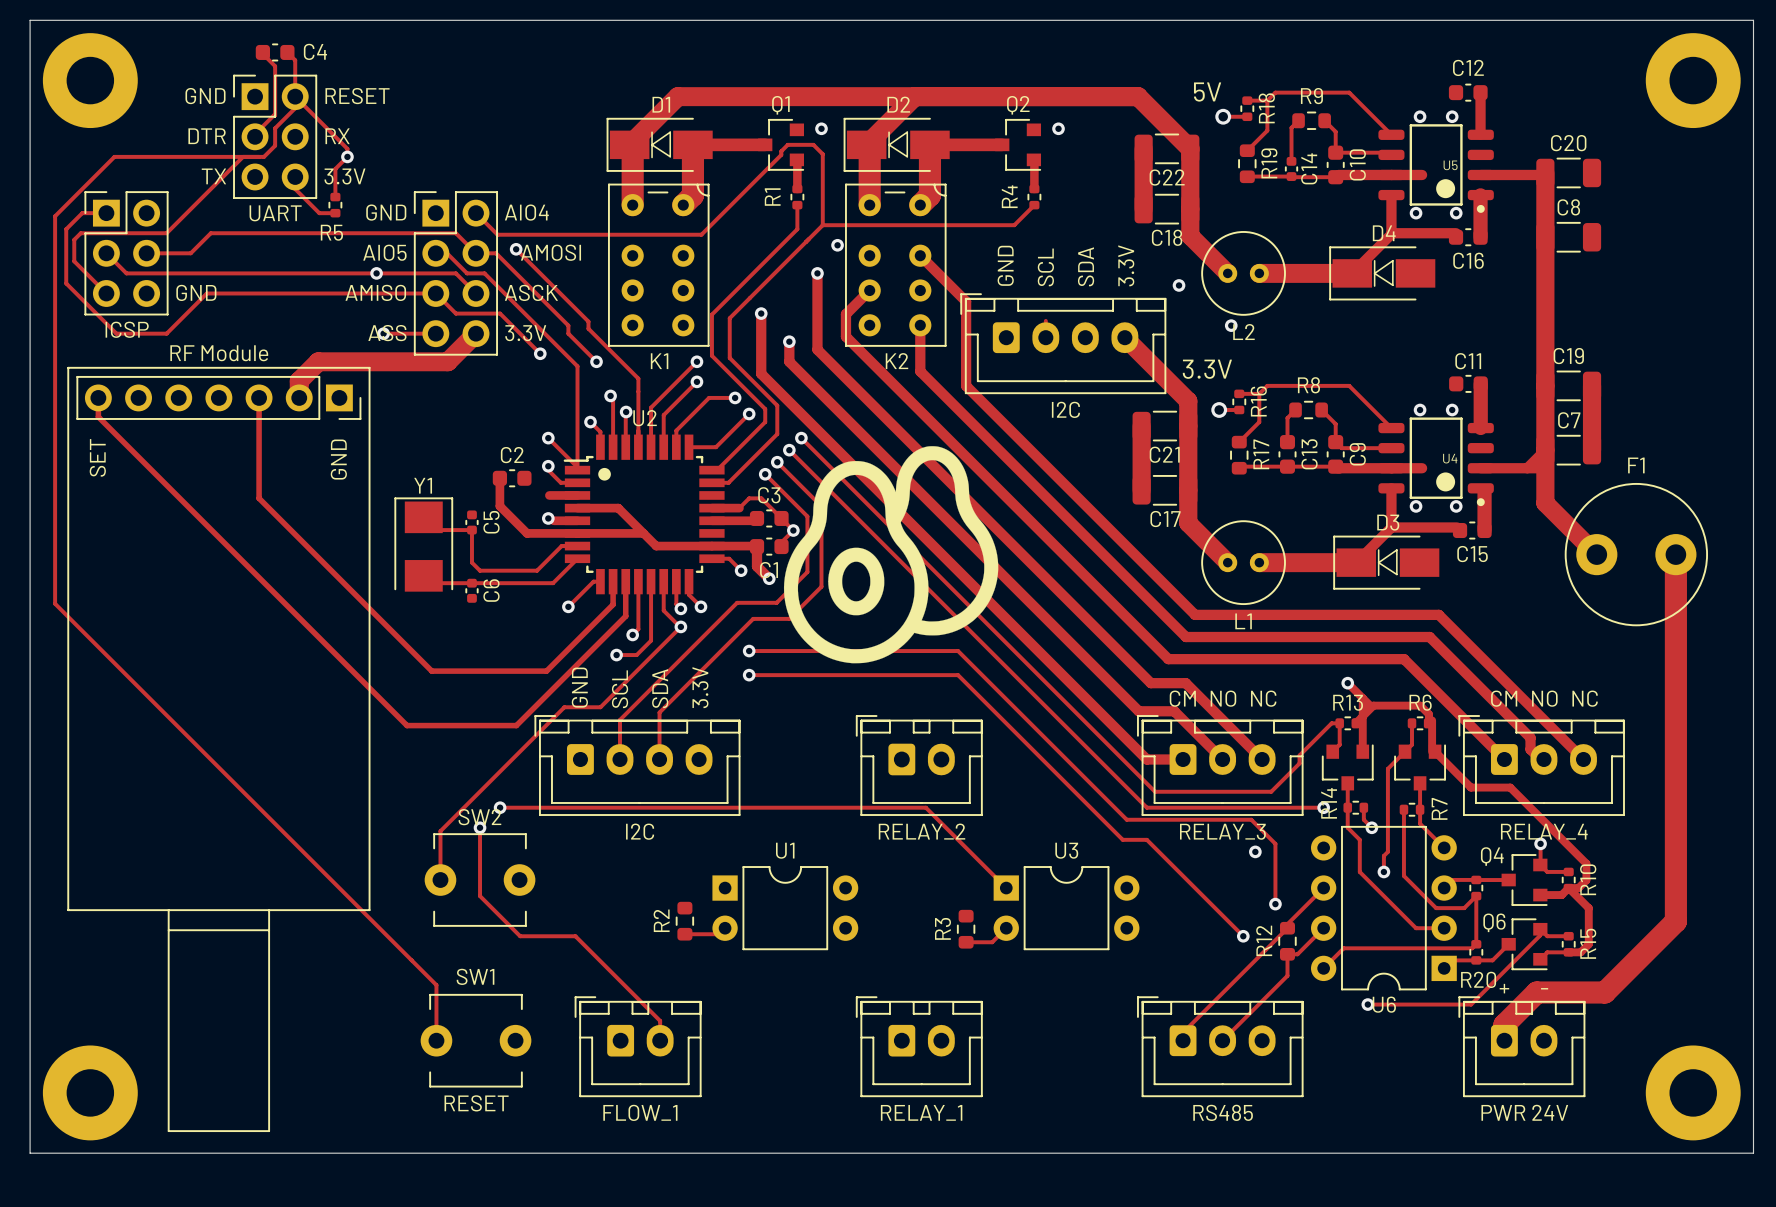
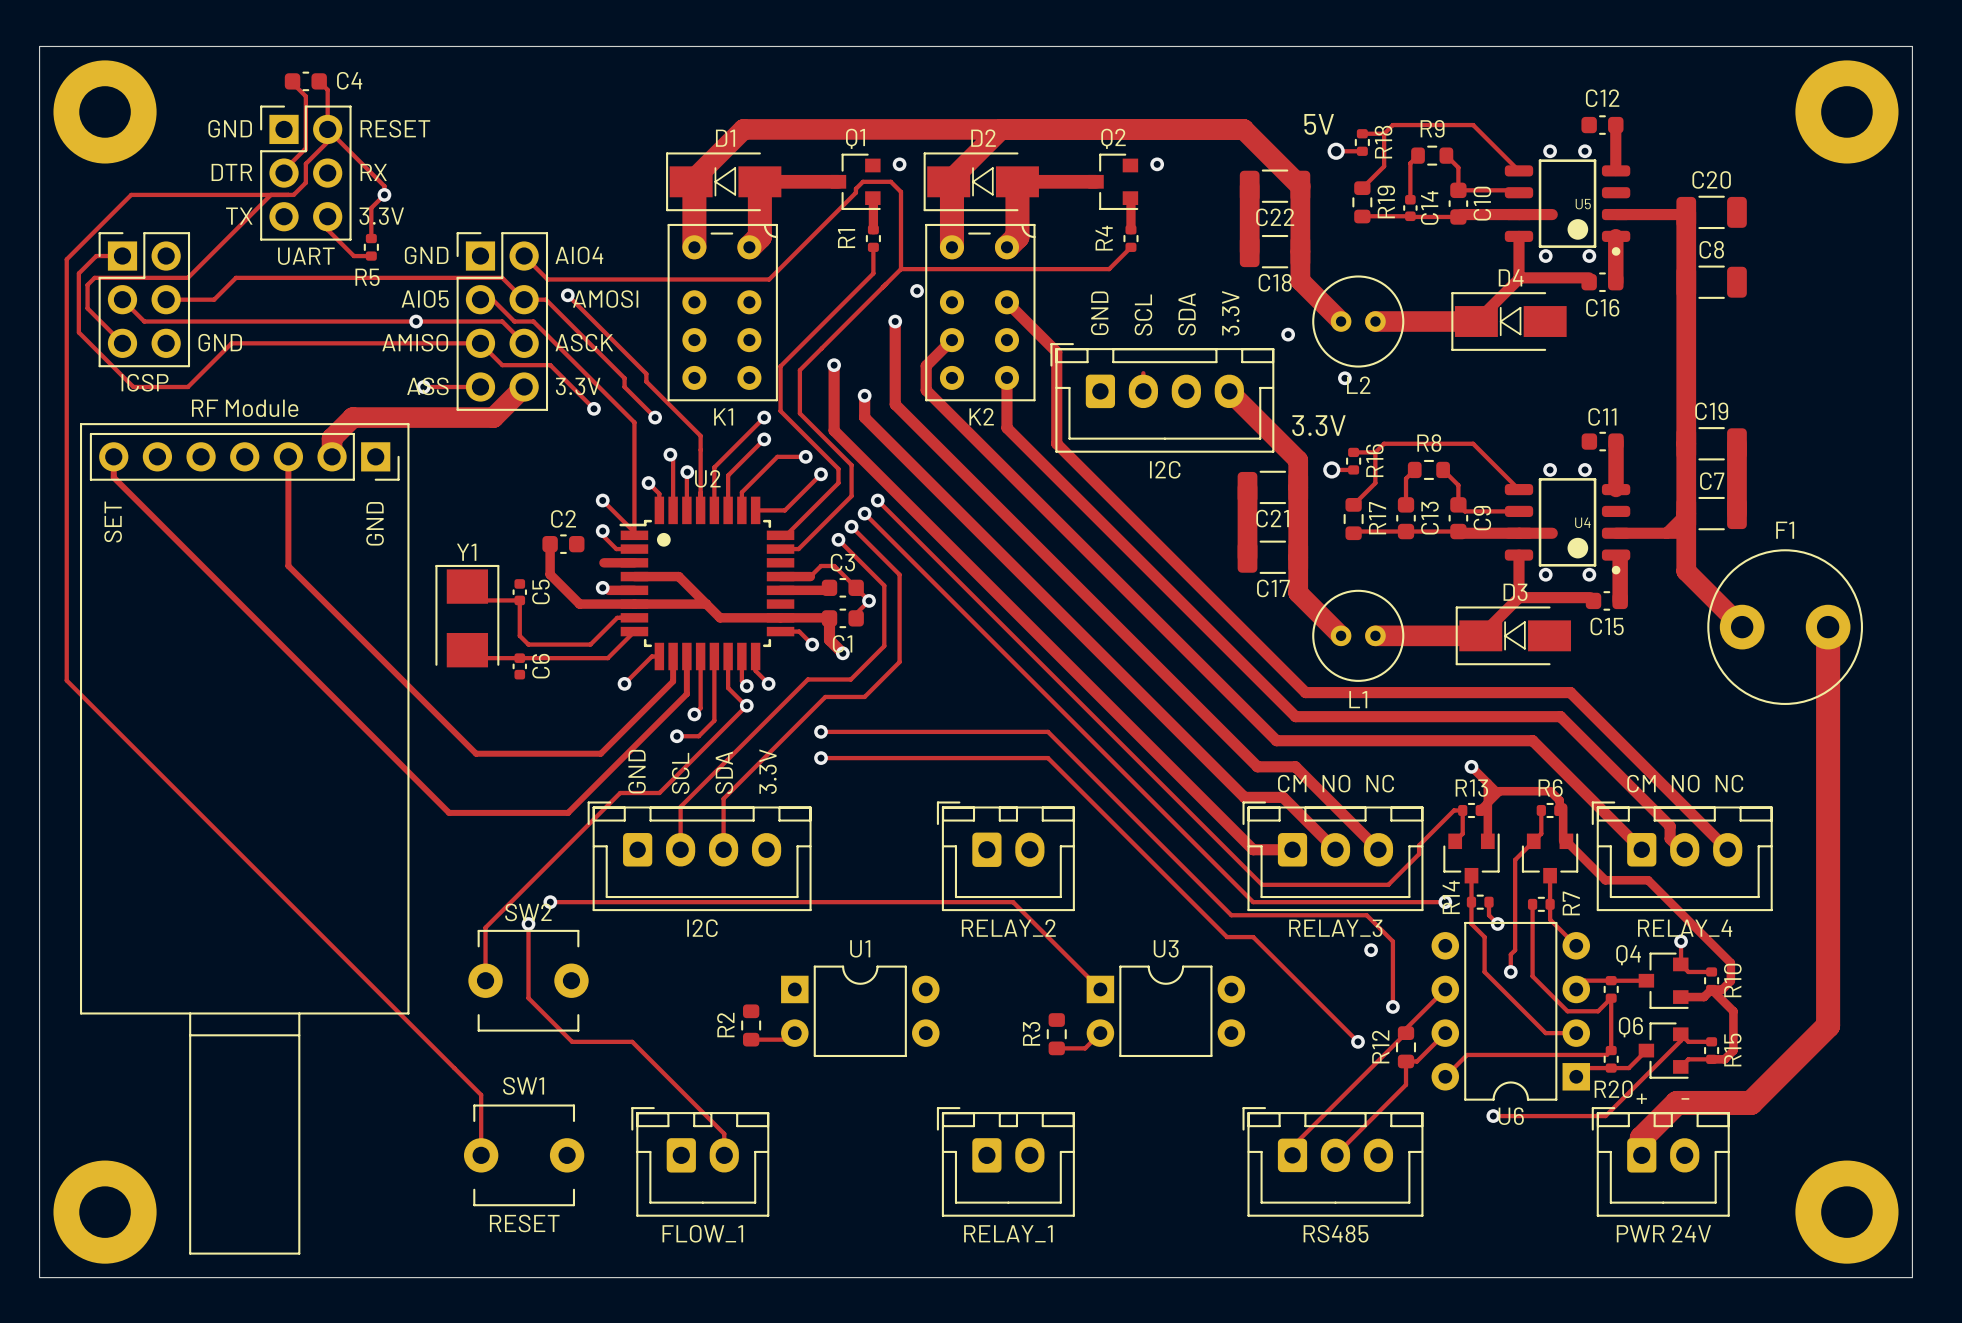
drawing: [783, 446, 999, 664] -> none

